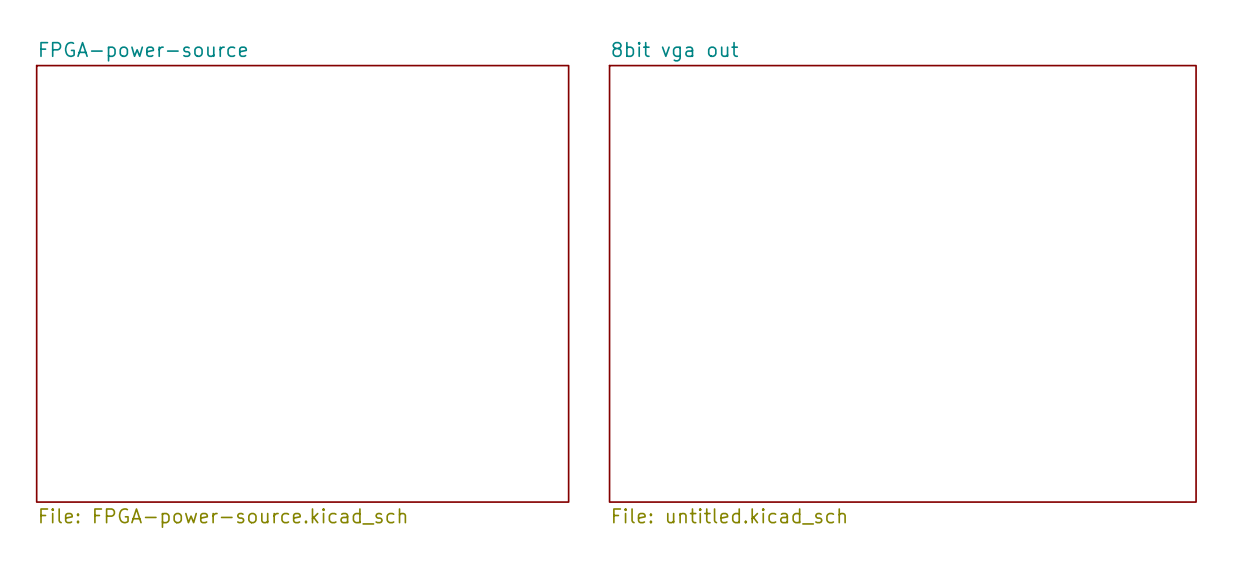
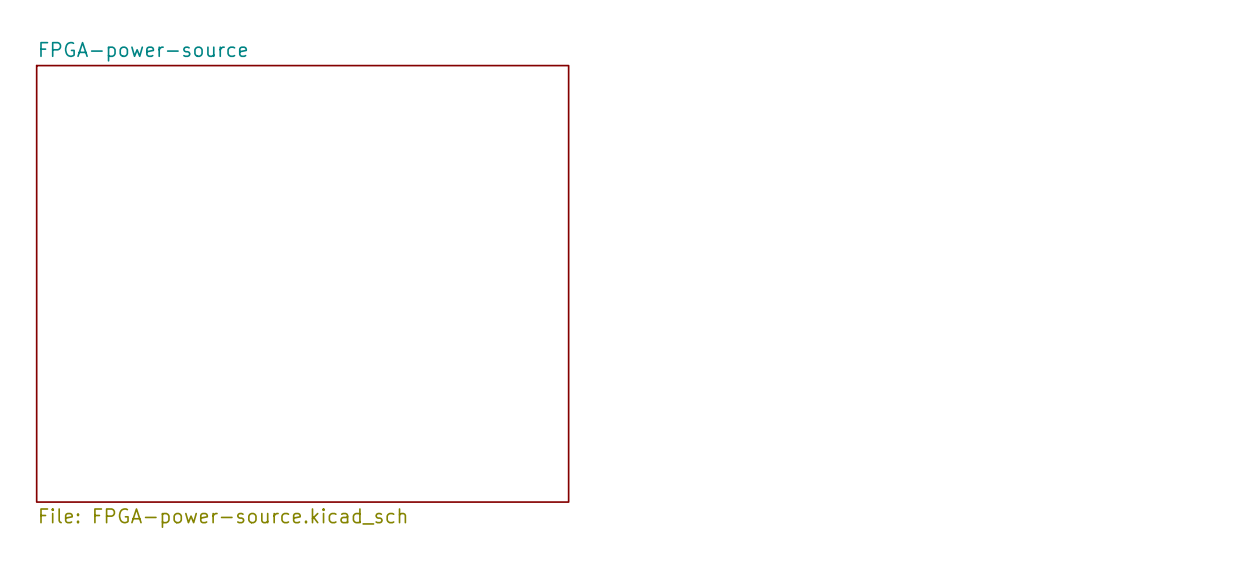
sheet 8bit vga out: File: untitled.kicad_sch (902, 283) -> none

